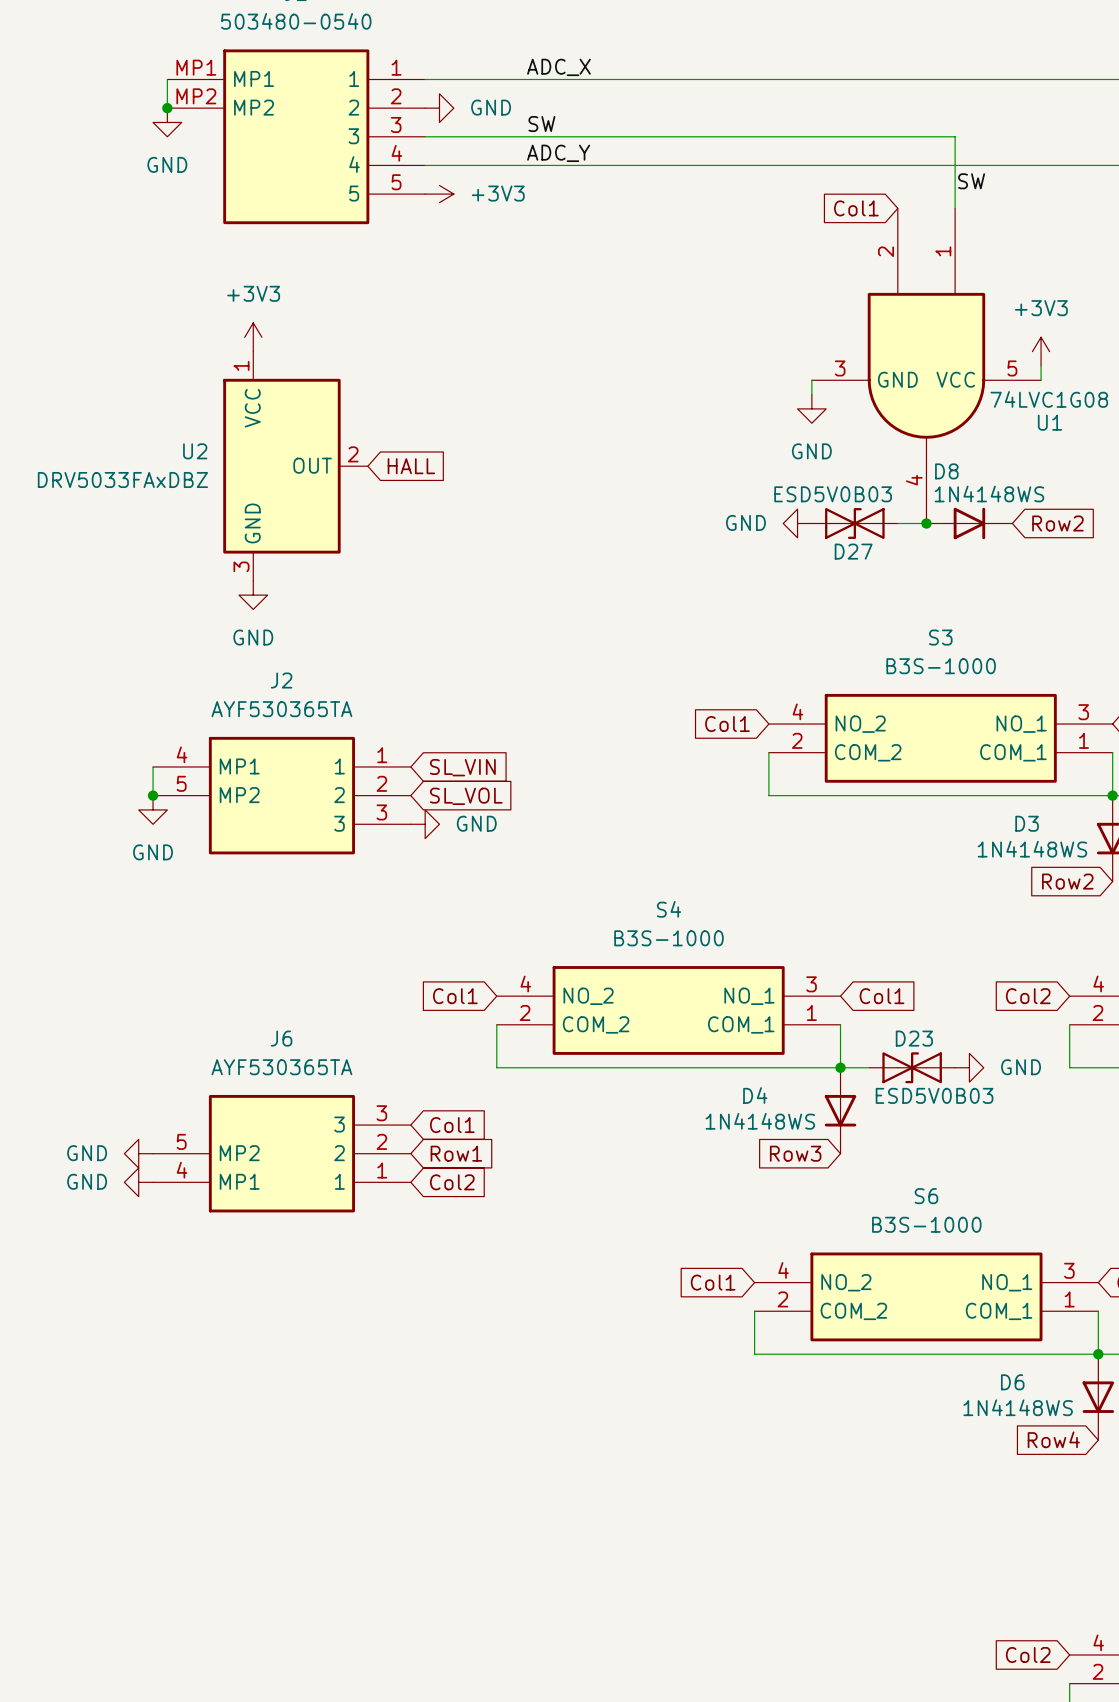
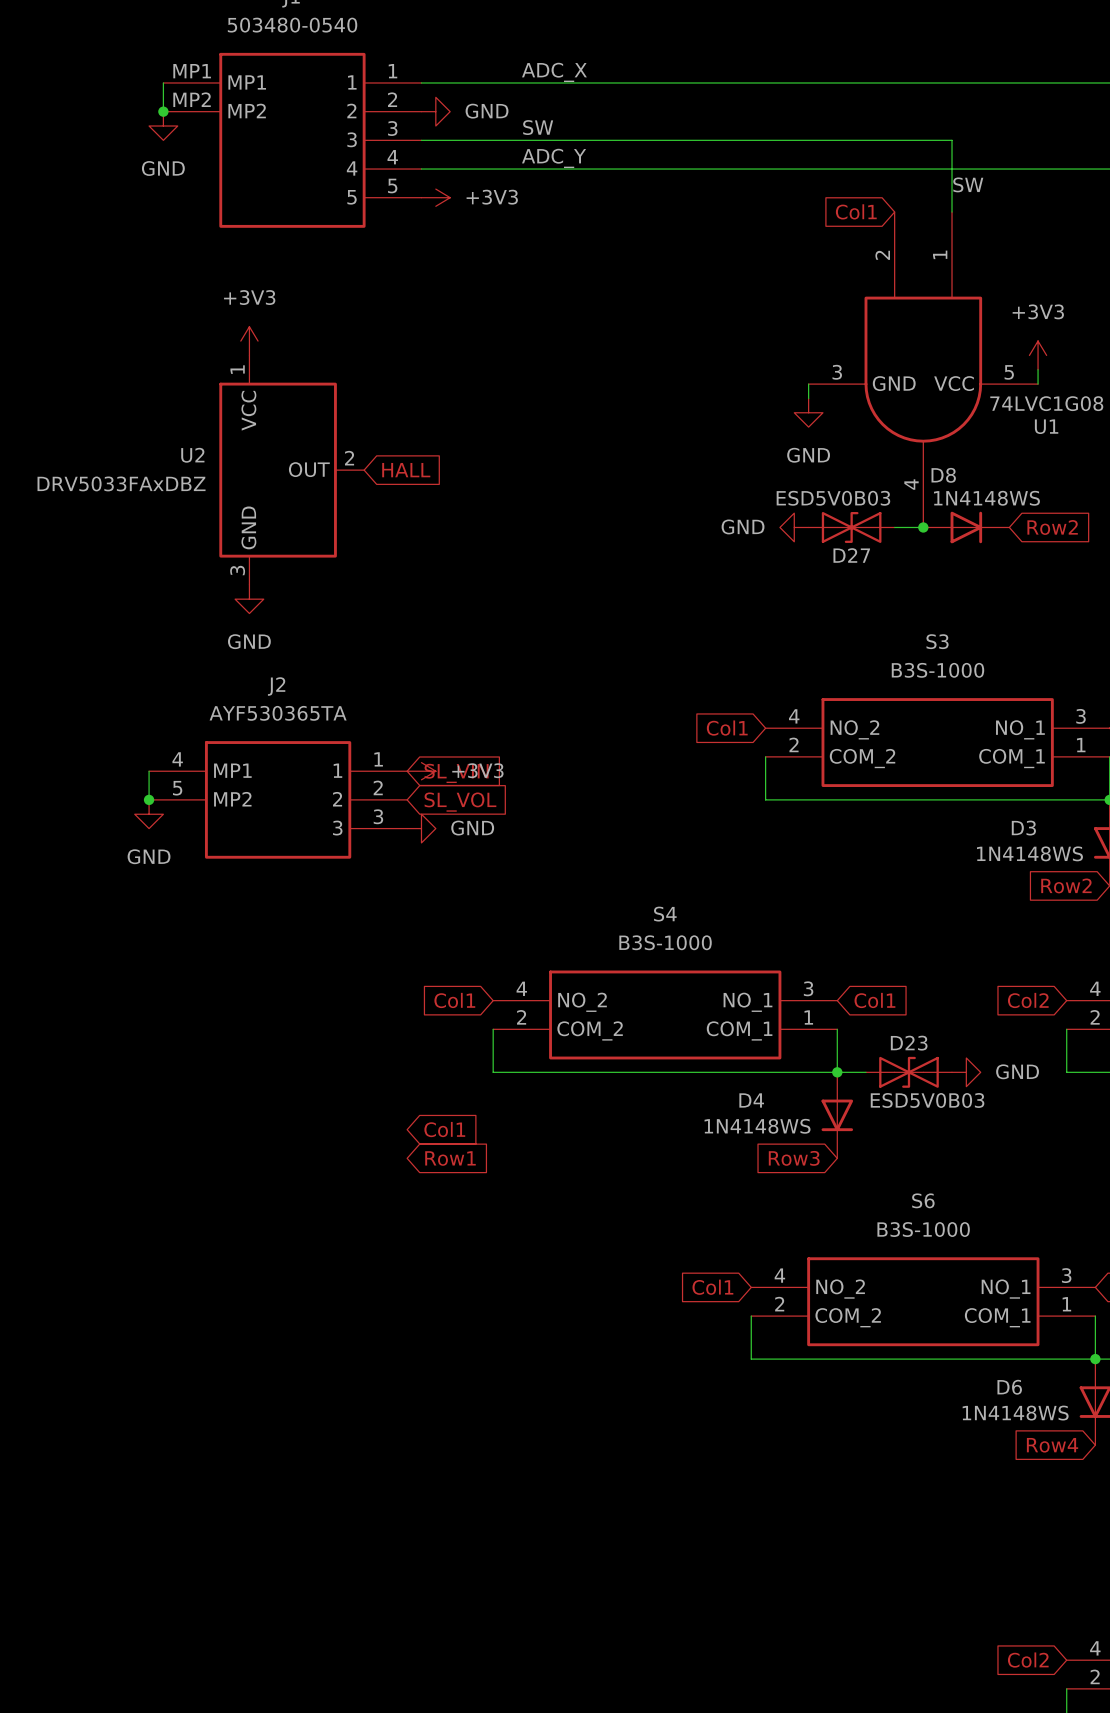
power symbol: none -> +3V3 (421, 771)
power symbol: GND (138, 1153) -> none
J6: AYF530365TA (281, 1153) -> none
power symbol: GND (138, 1182) -> none
global label: Col2 (452, 1182) -> none

